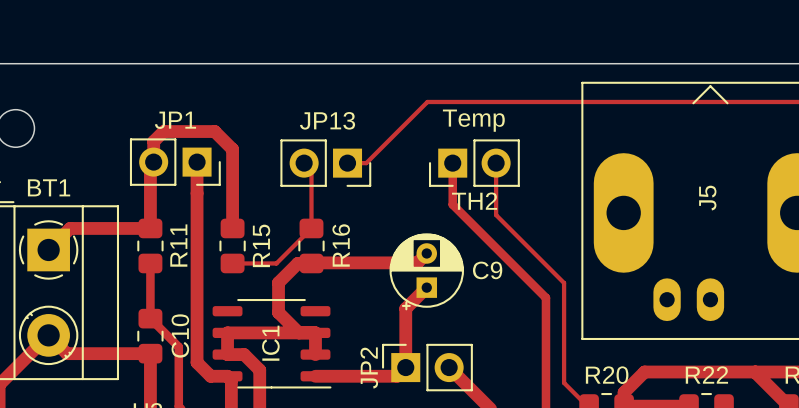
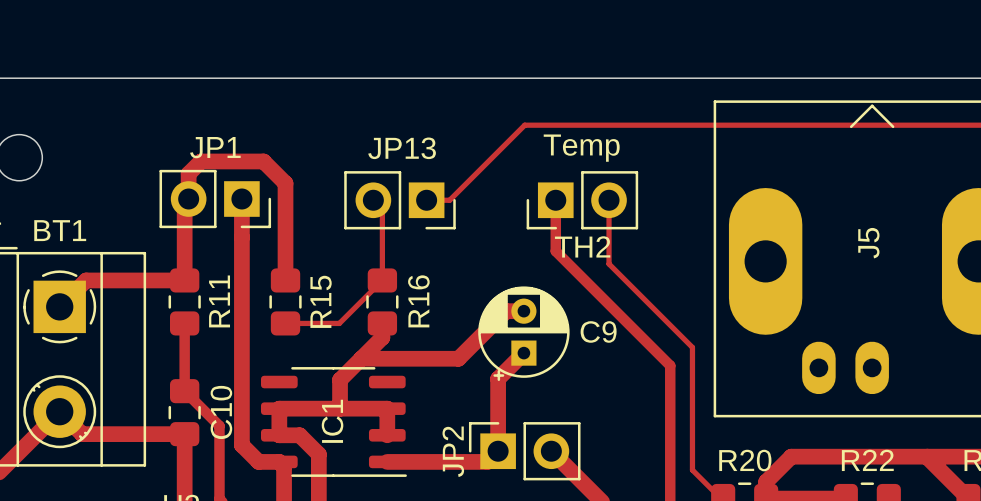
track: (426, 253) (417, 262) (297, 263) (278, 282) (278, 312) (298, 332) -> (523, 311) (506, 311) (458, 358) (361, 358)
track: none -> (382, 323) (382, 337) (340, 379) (340, 408)

